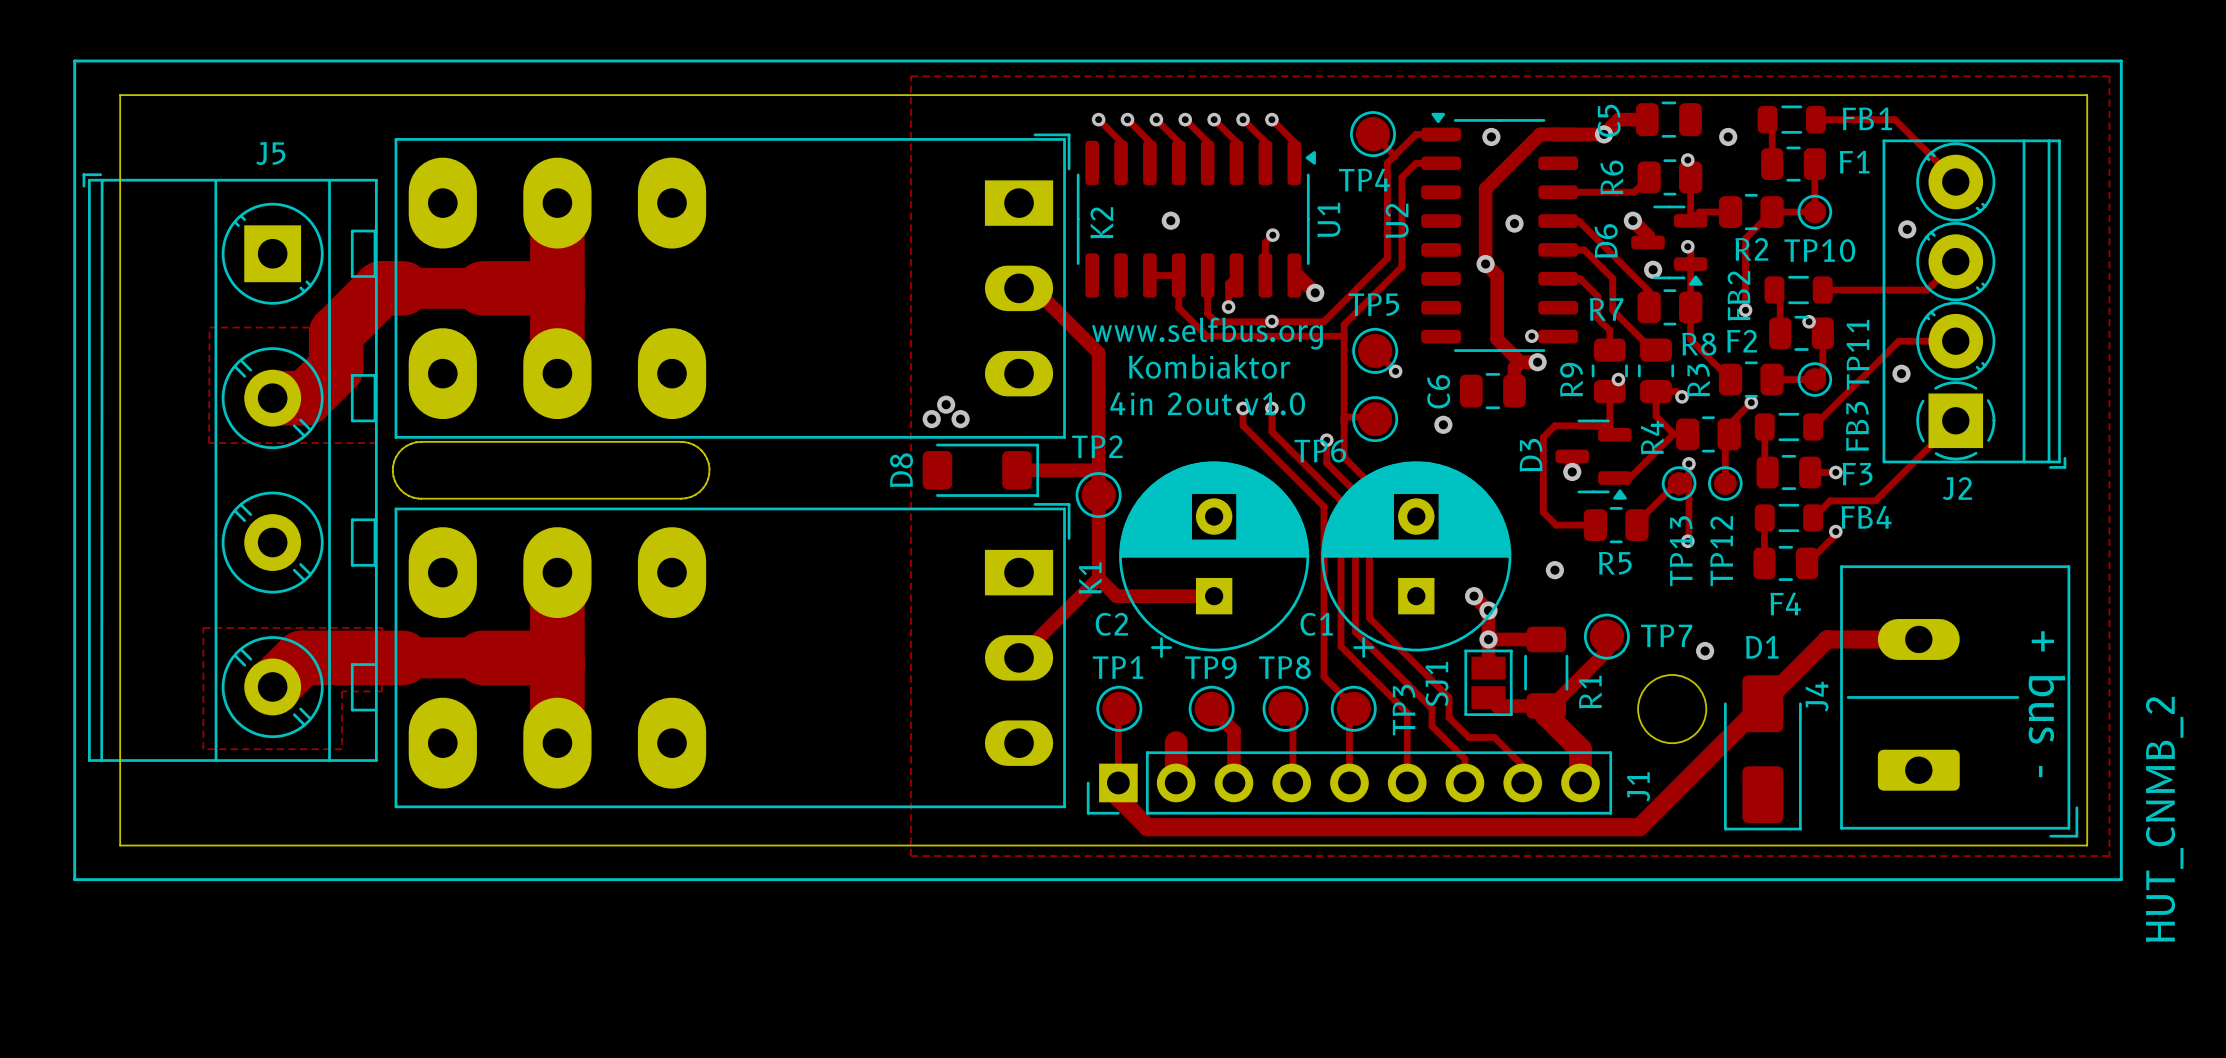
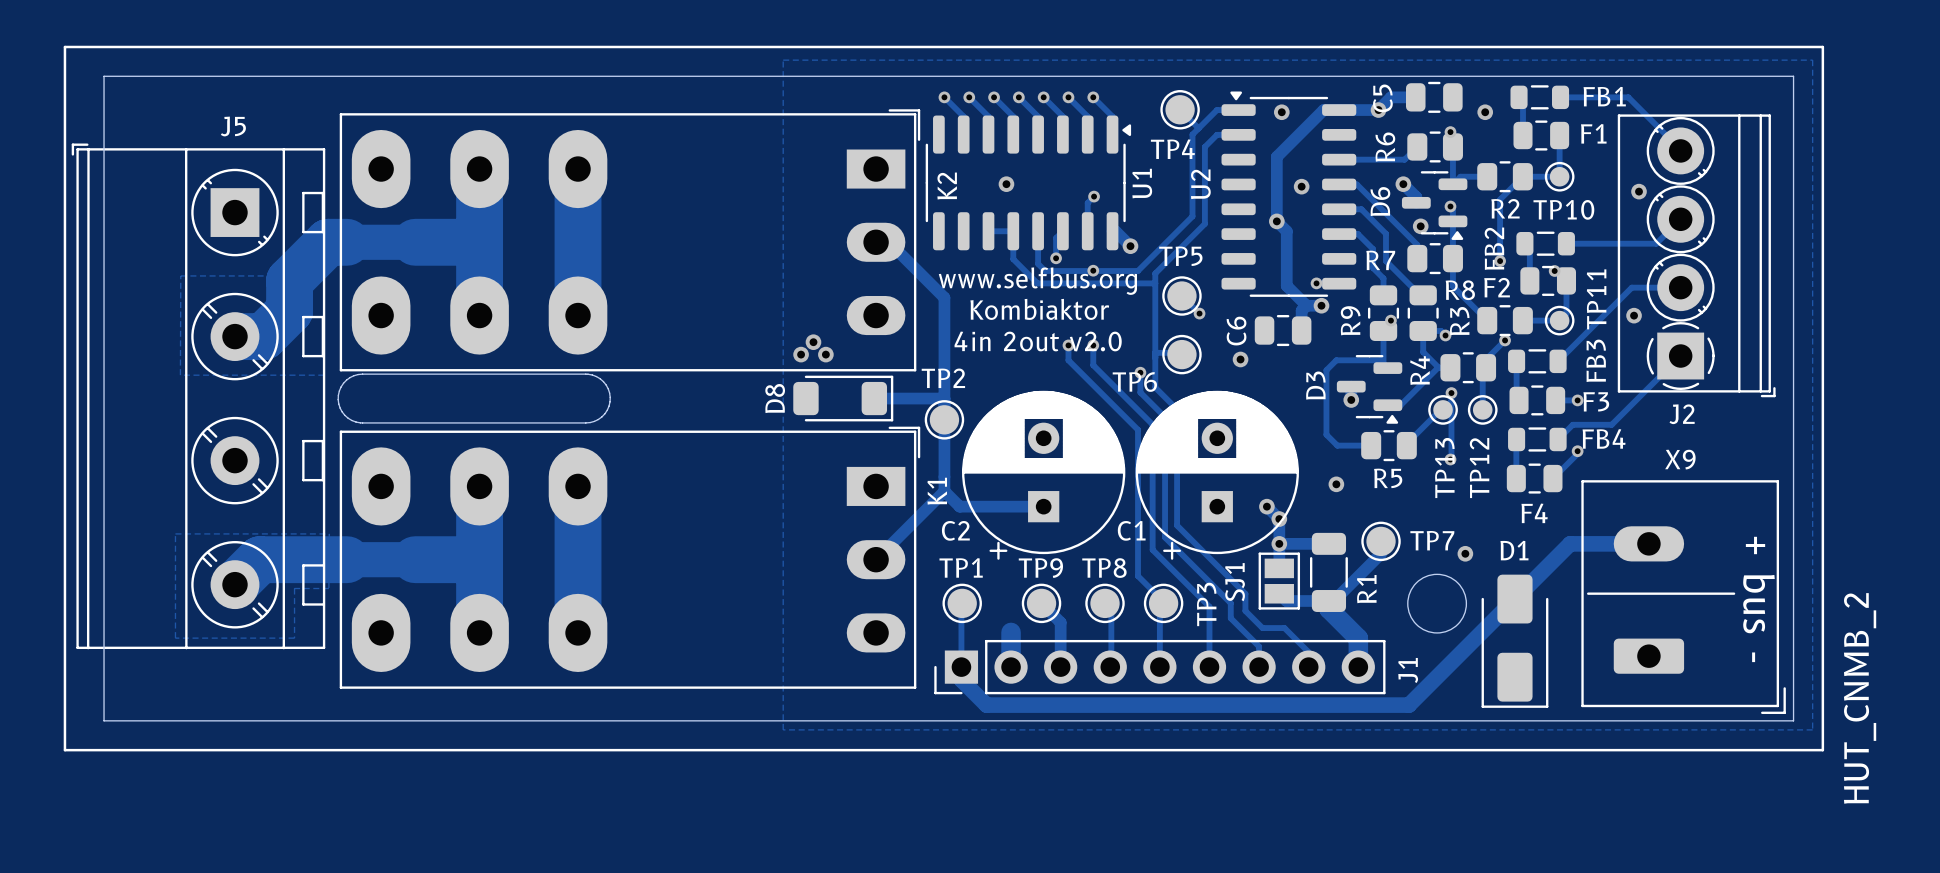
track: none -> (578, 169) (578, 315)
text: 4in 2out v1.0 (1207, 403) -> 4in 2out v2.0 (1038, 341)
track: none -> (578, 486) (578, 632)
J4 name: J4 (1817, 696) -> X9 (1680, 459)

